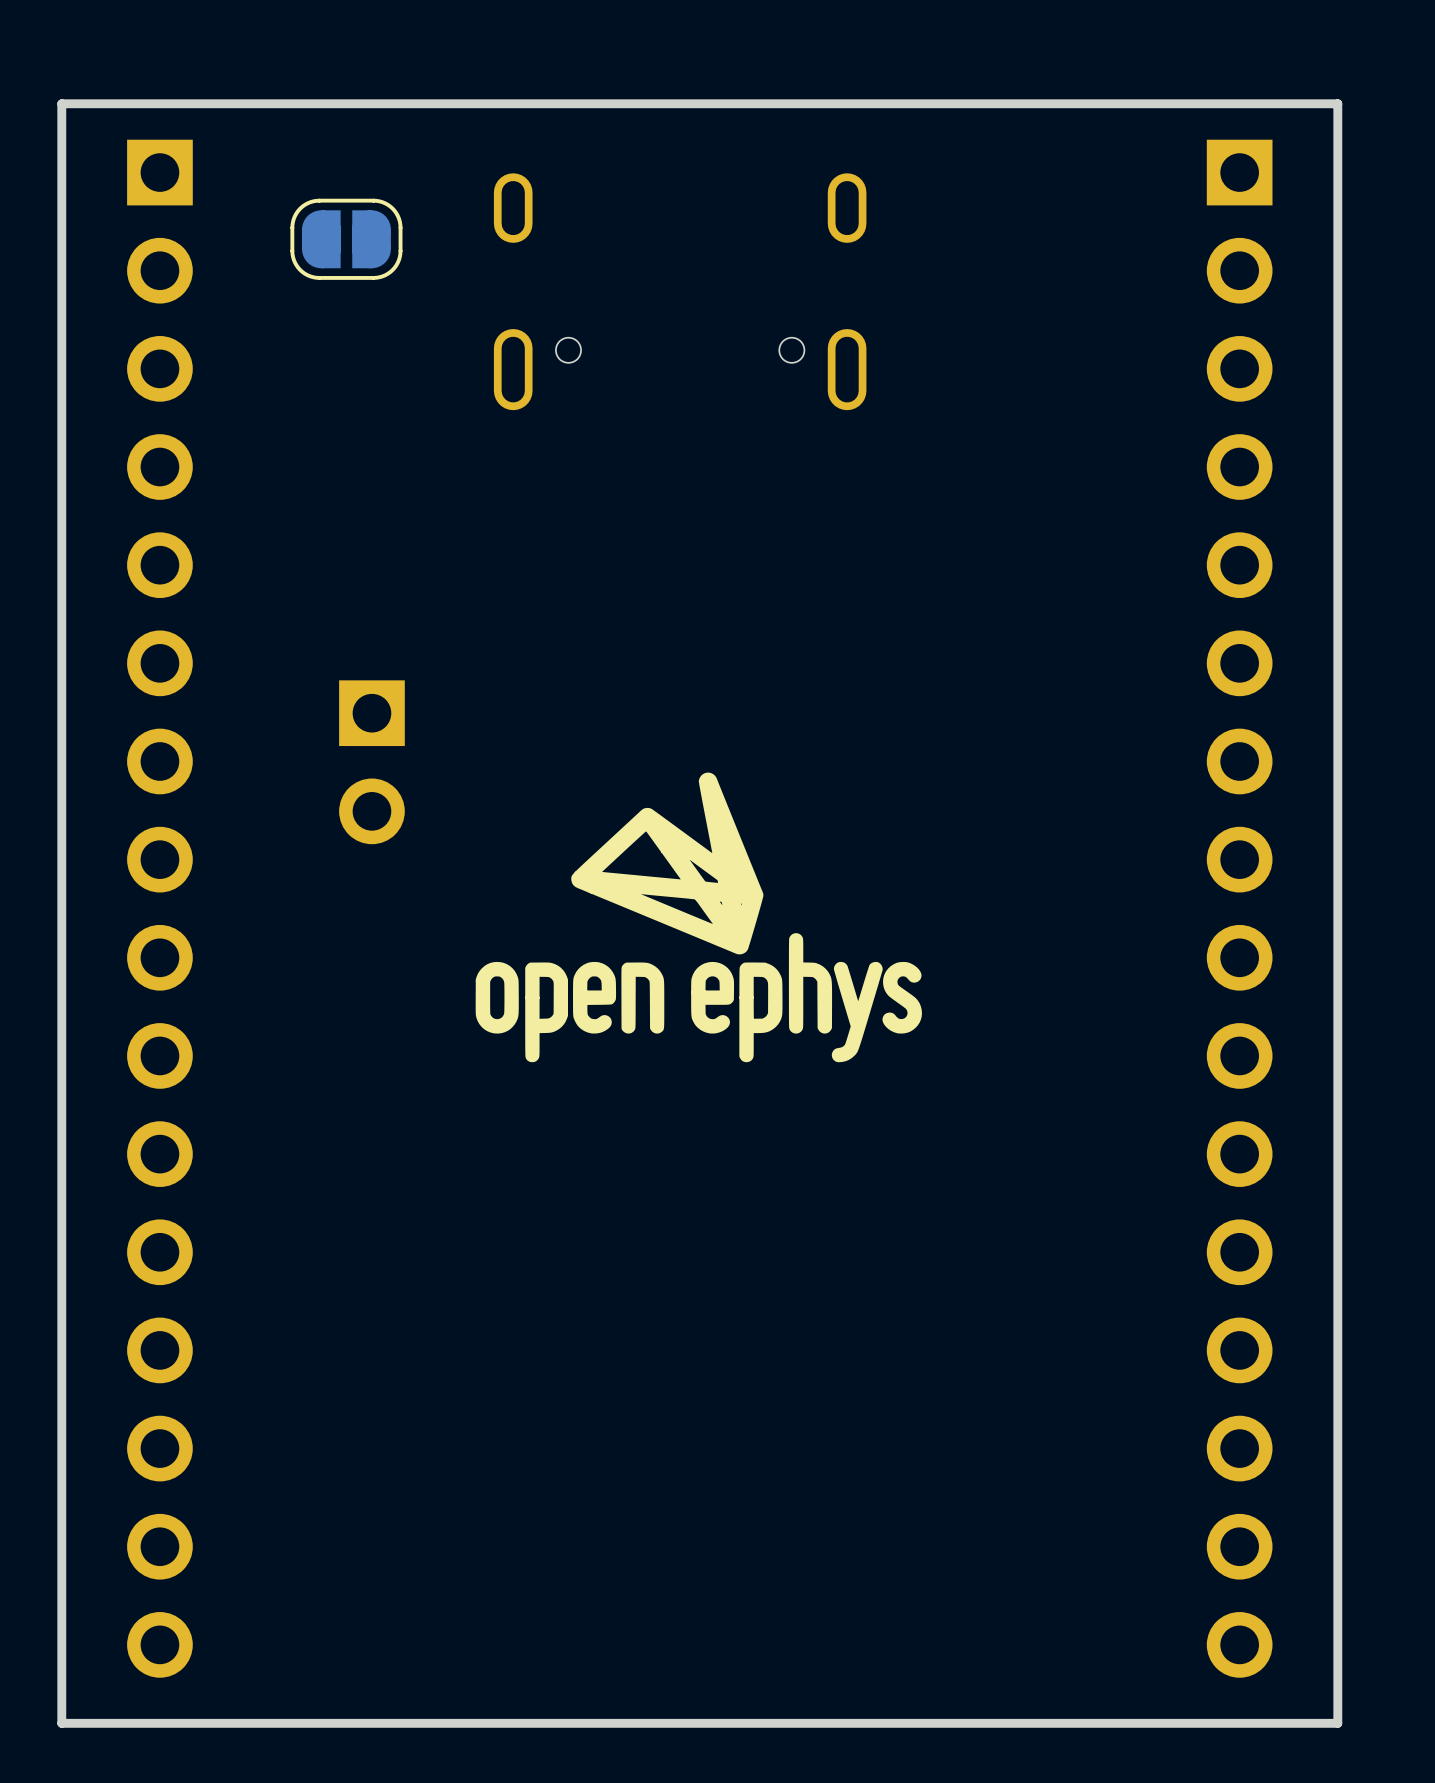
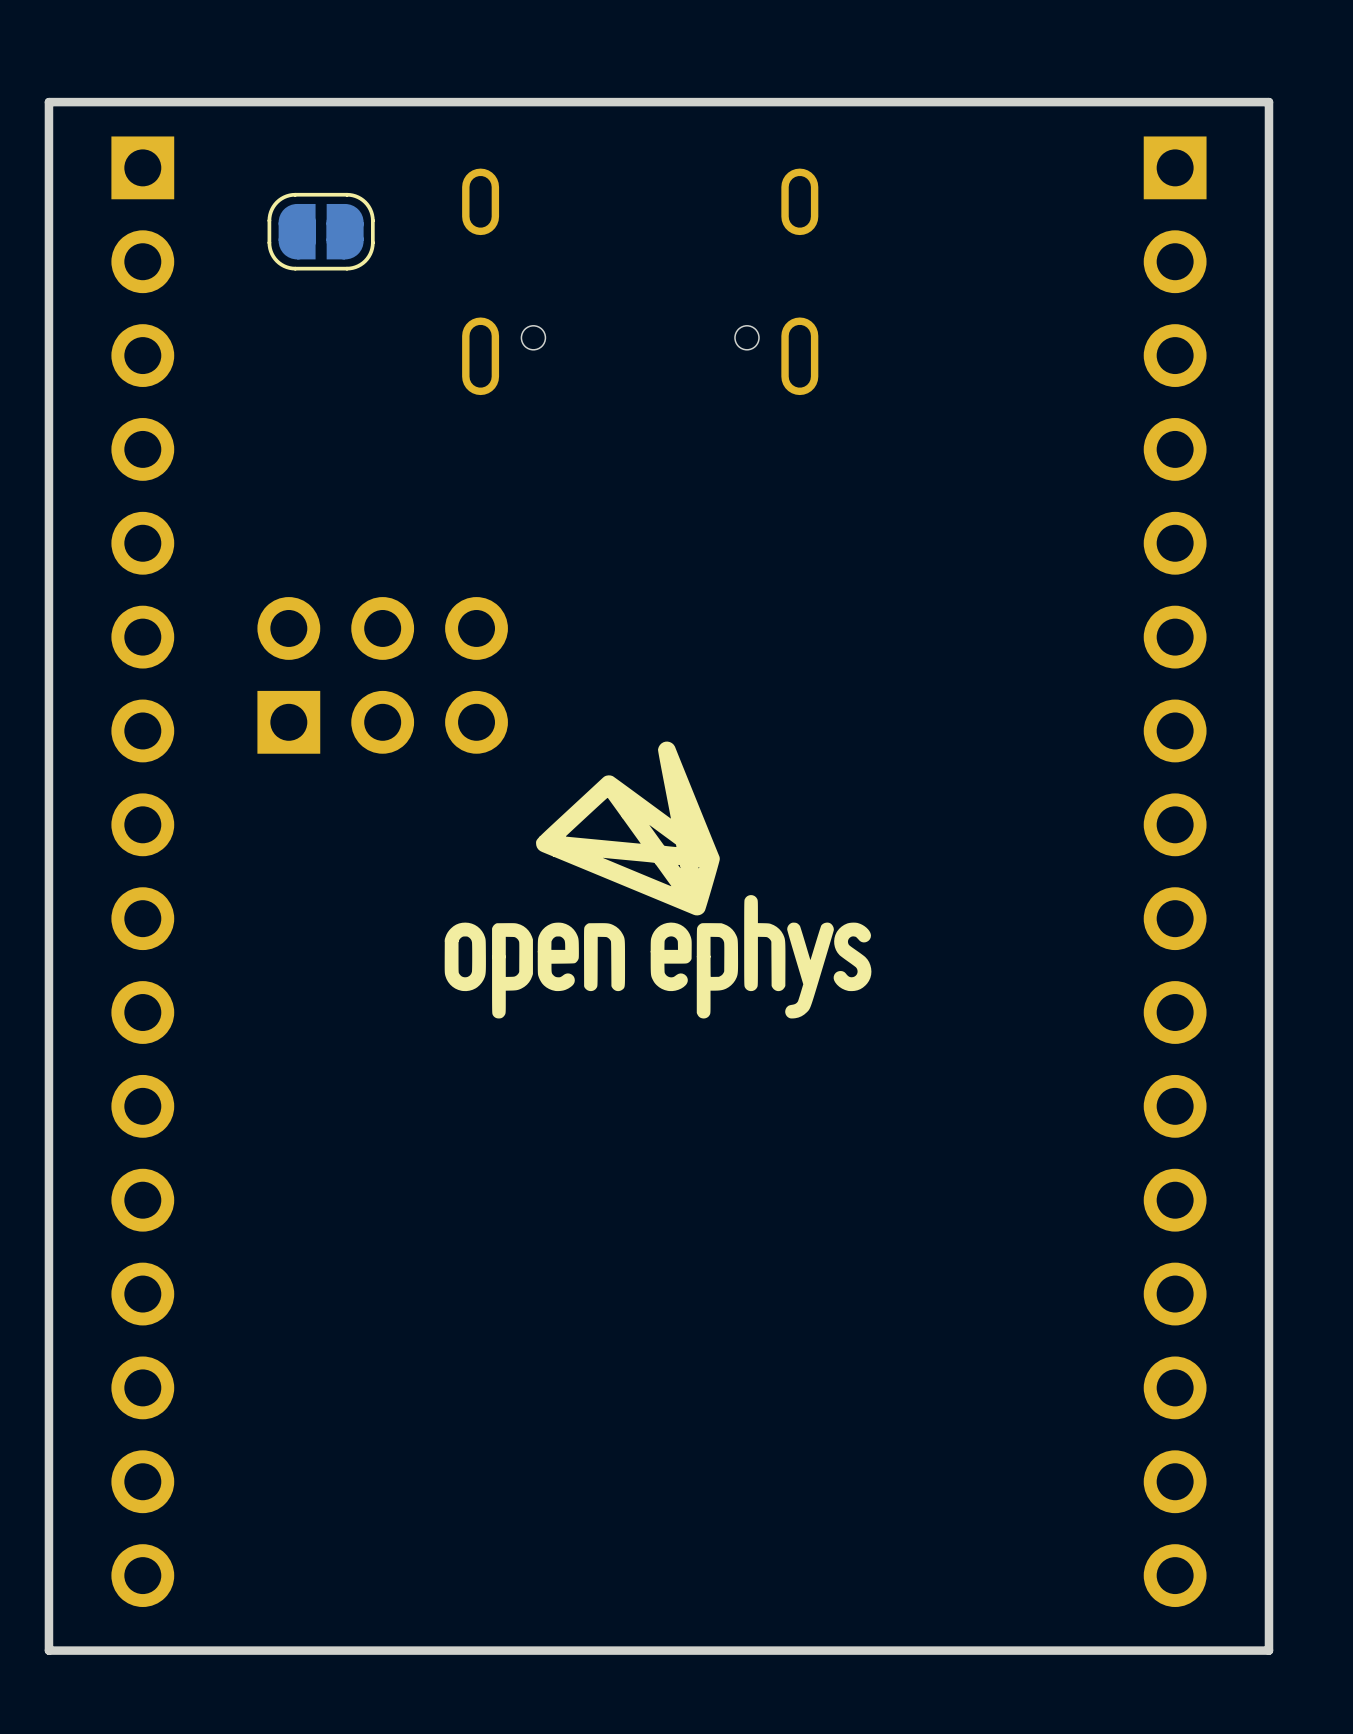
part: none -> (382, 675)
part: (371, 762) -> none

